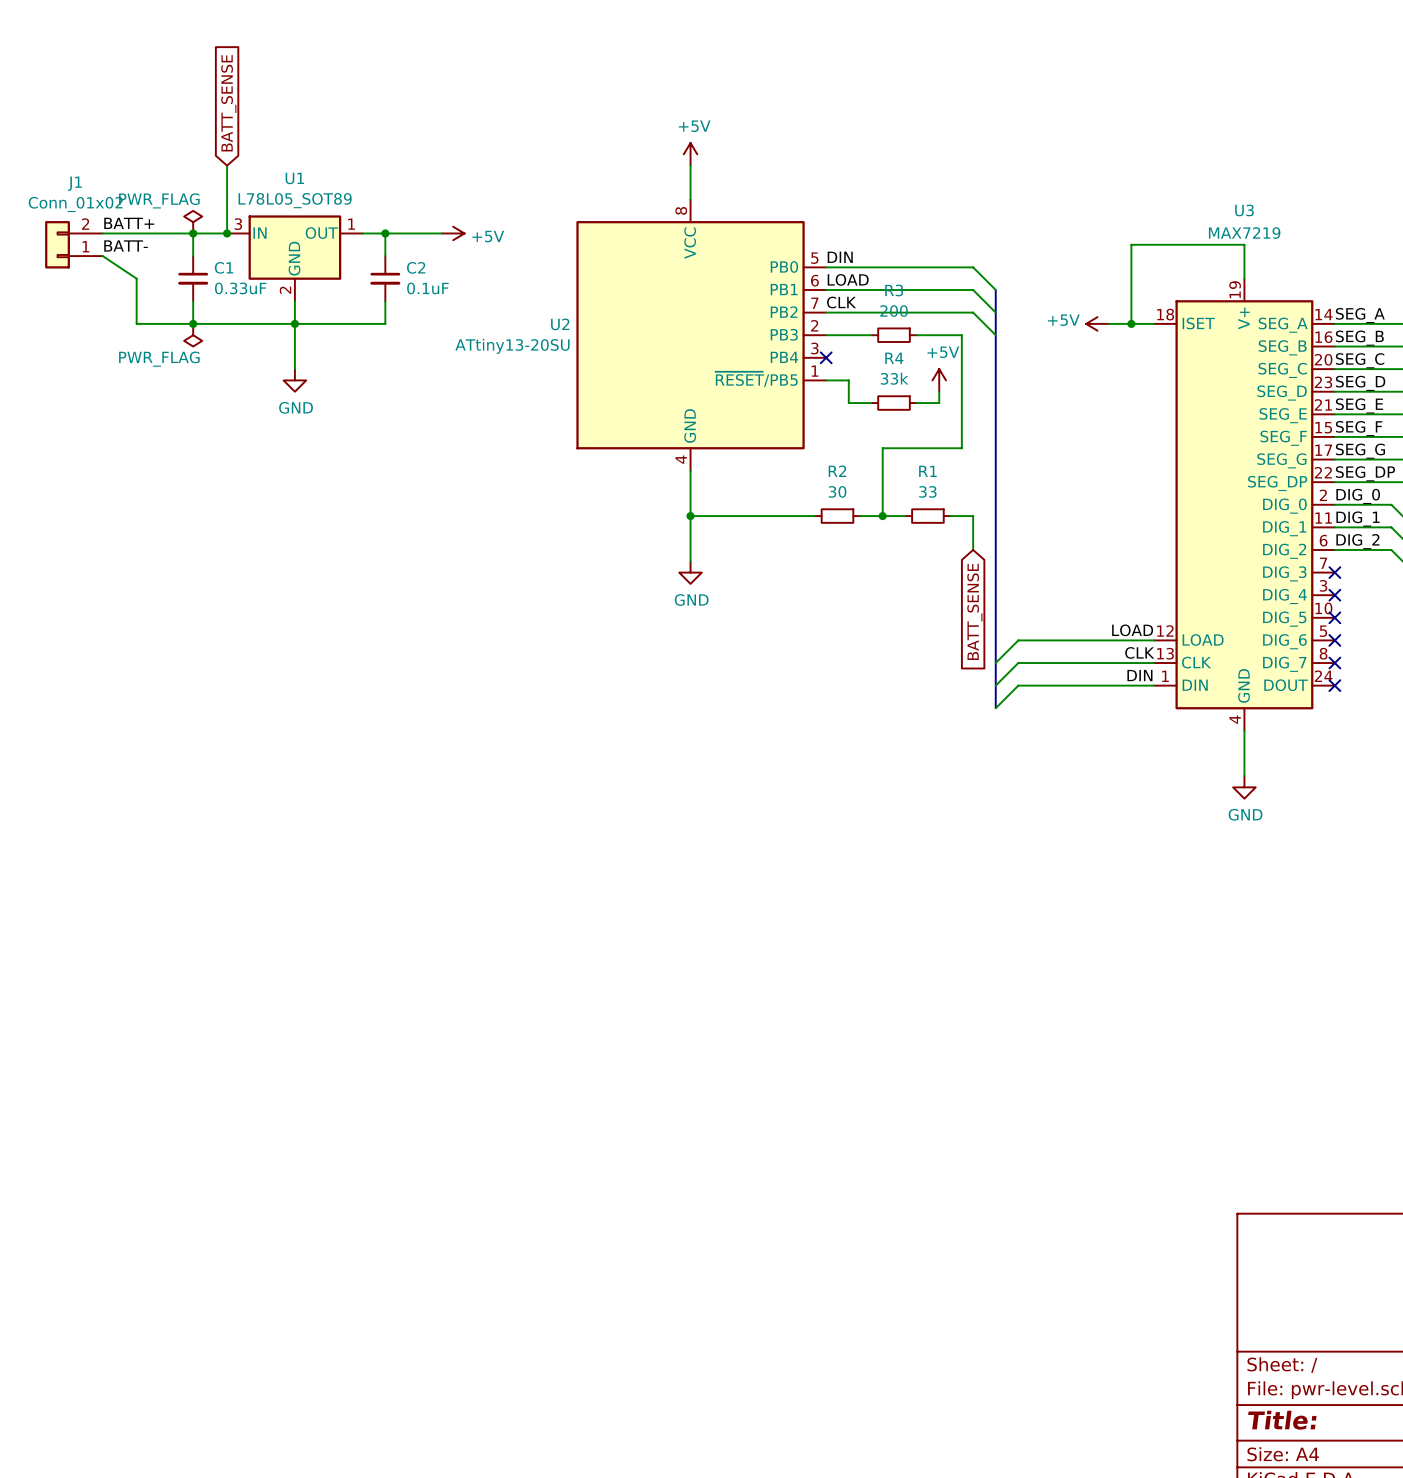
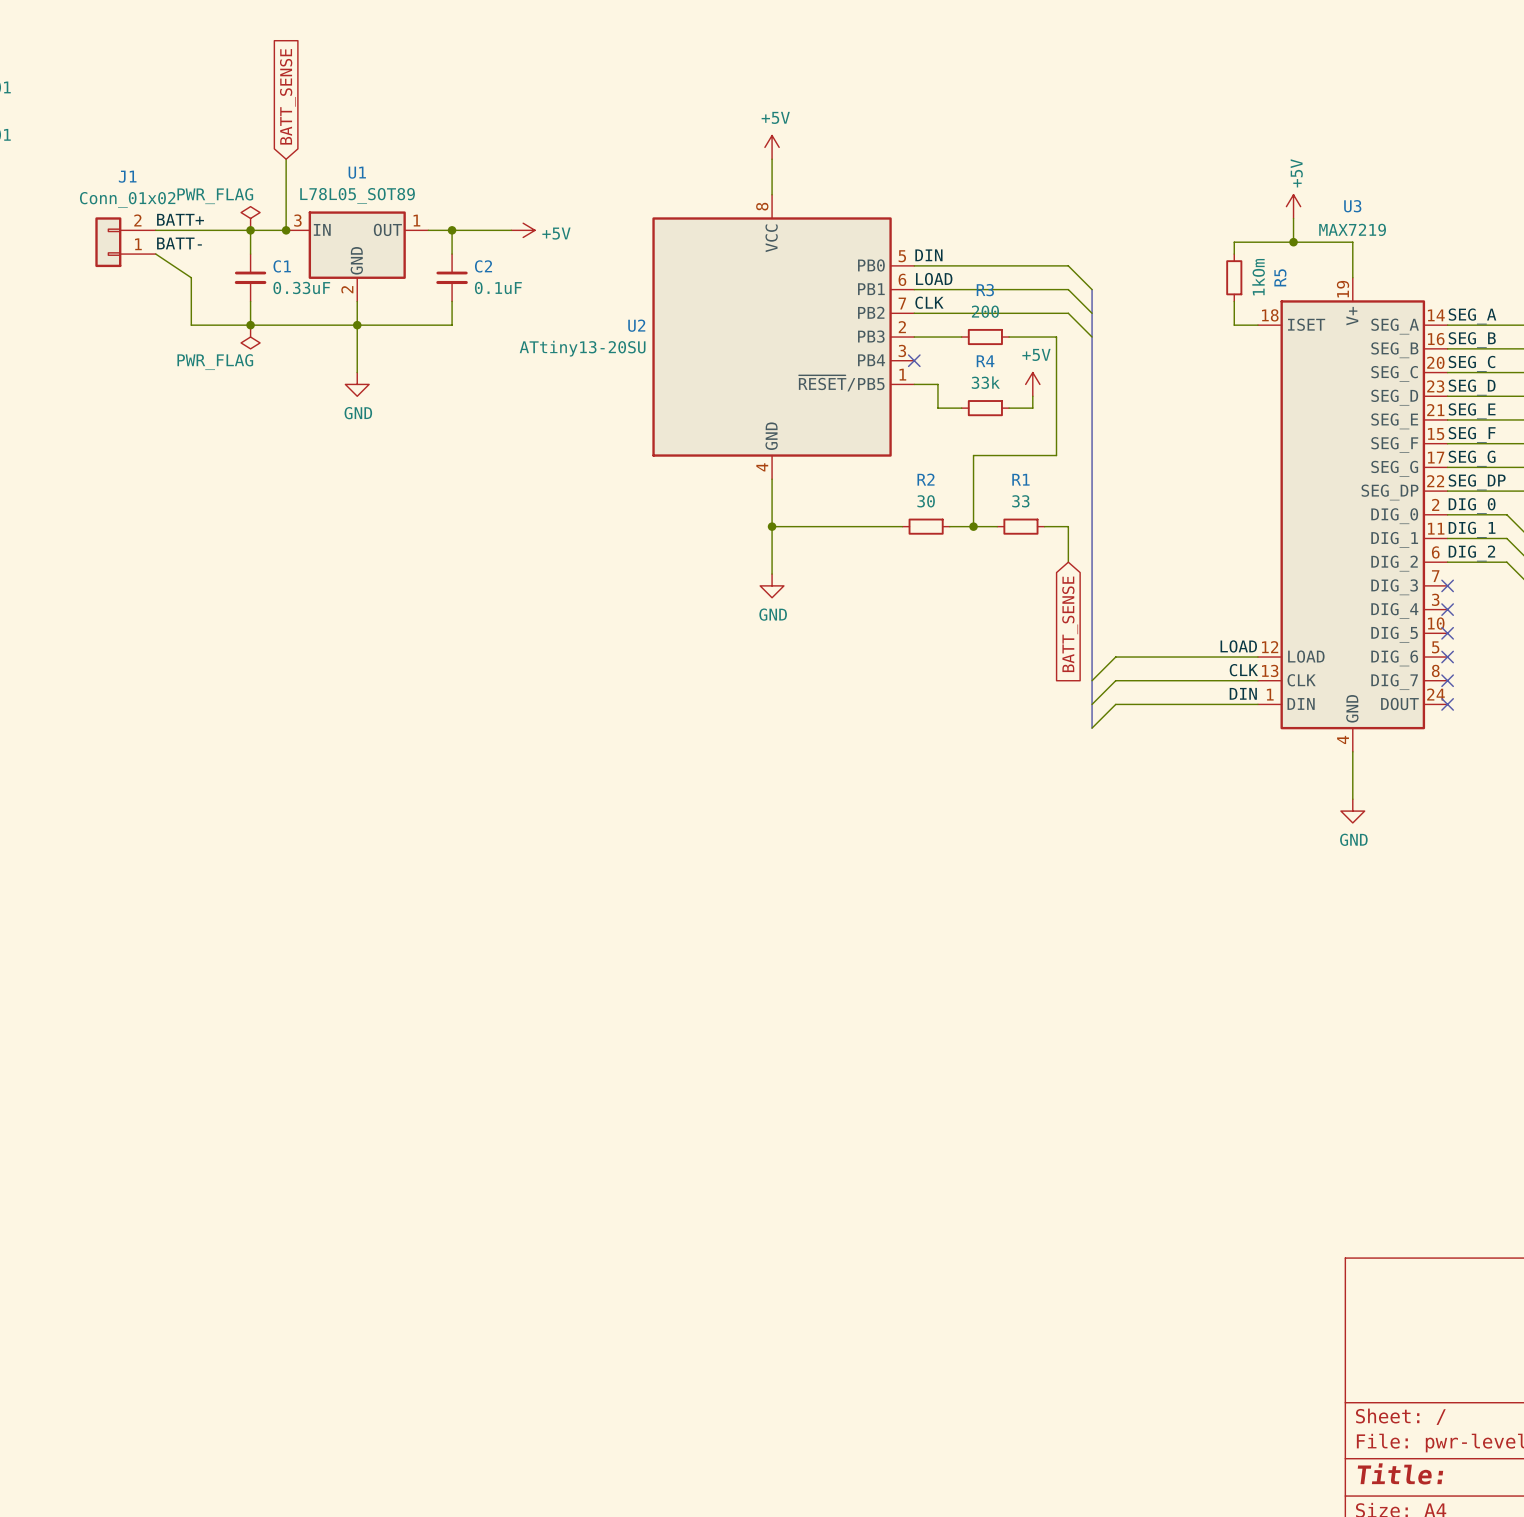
wire: none -> (1293, 218) (1293, 242)
junction: none -> (1293, 242)
wire: (1131, 256) (1131, 301) -> none
R5: none -> 1kOm (1234, 277)
power symbol rotation: 0° (1097, 323) -> 90° clockwise (1293, 206)
power symbol position: +5V (1097, 323) -> +5V (1293, 206)
wire: (1108, 323) (1131, 323) -> none
junction: (1131, 323) -> none

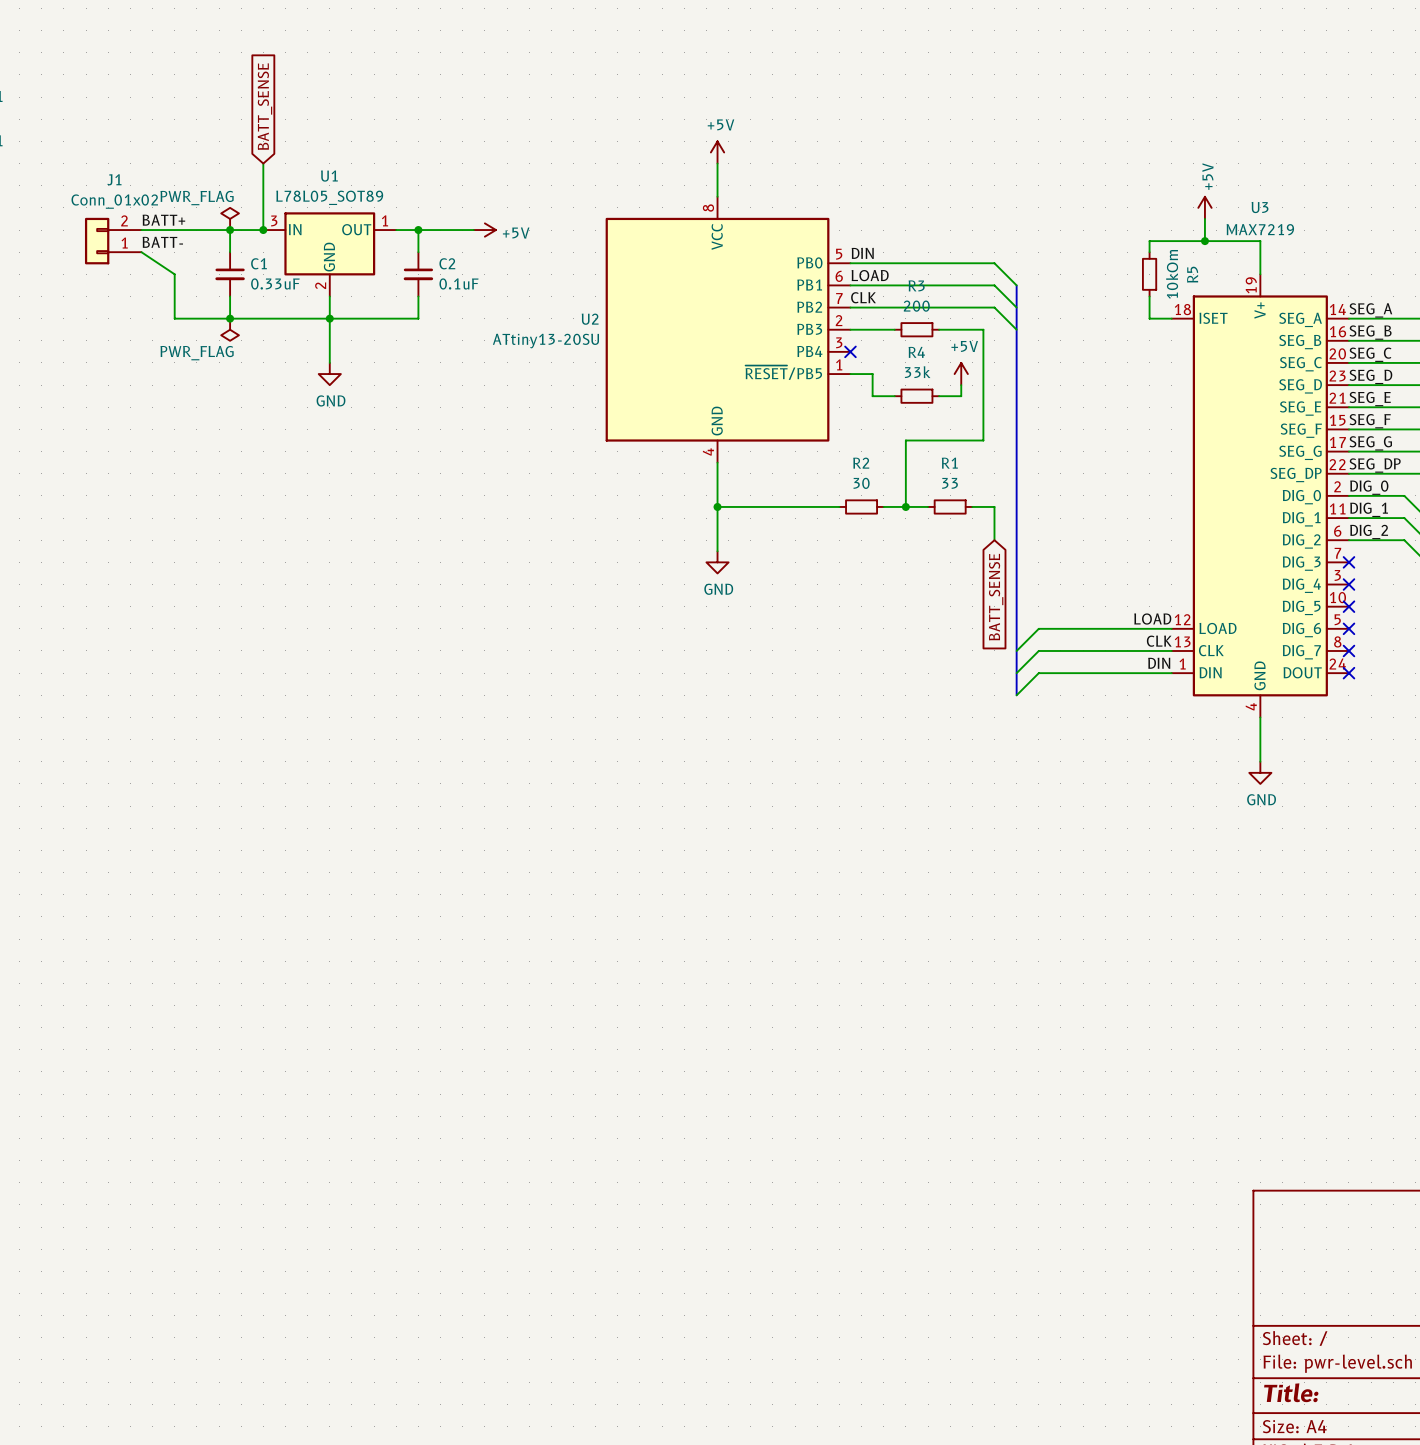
R5 value: 1kOm (1258, 277) -> 10kOm (1172, 274)

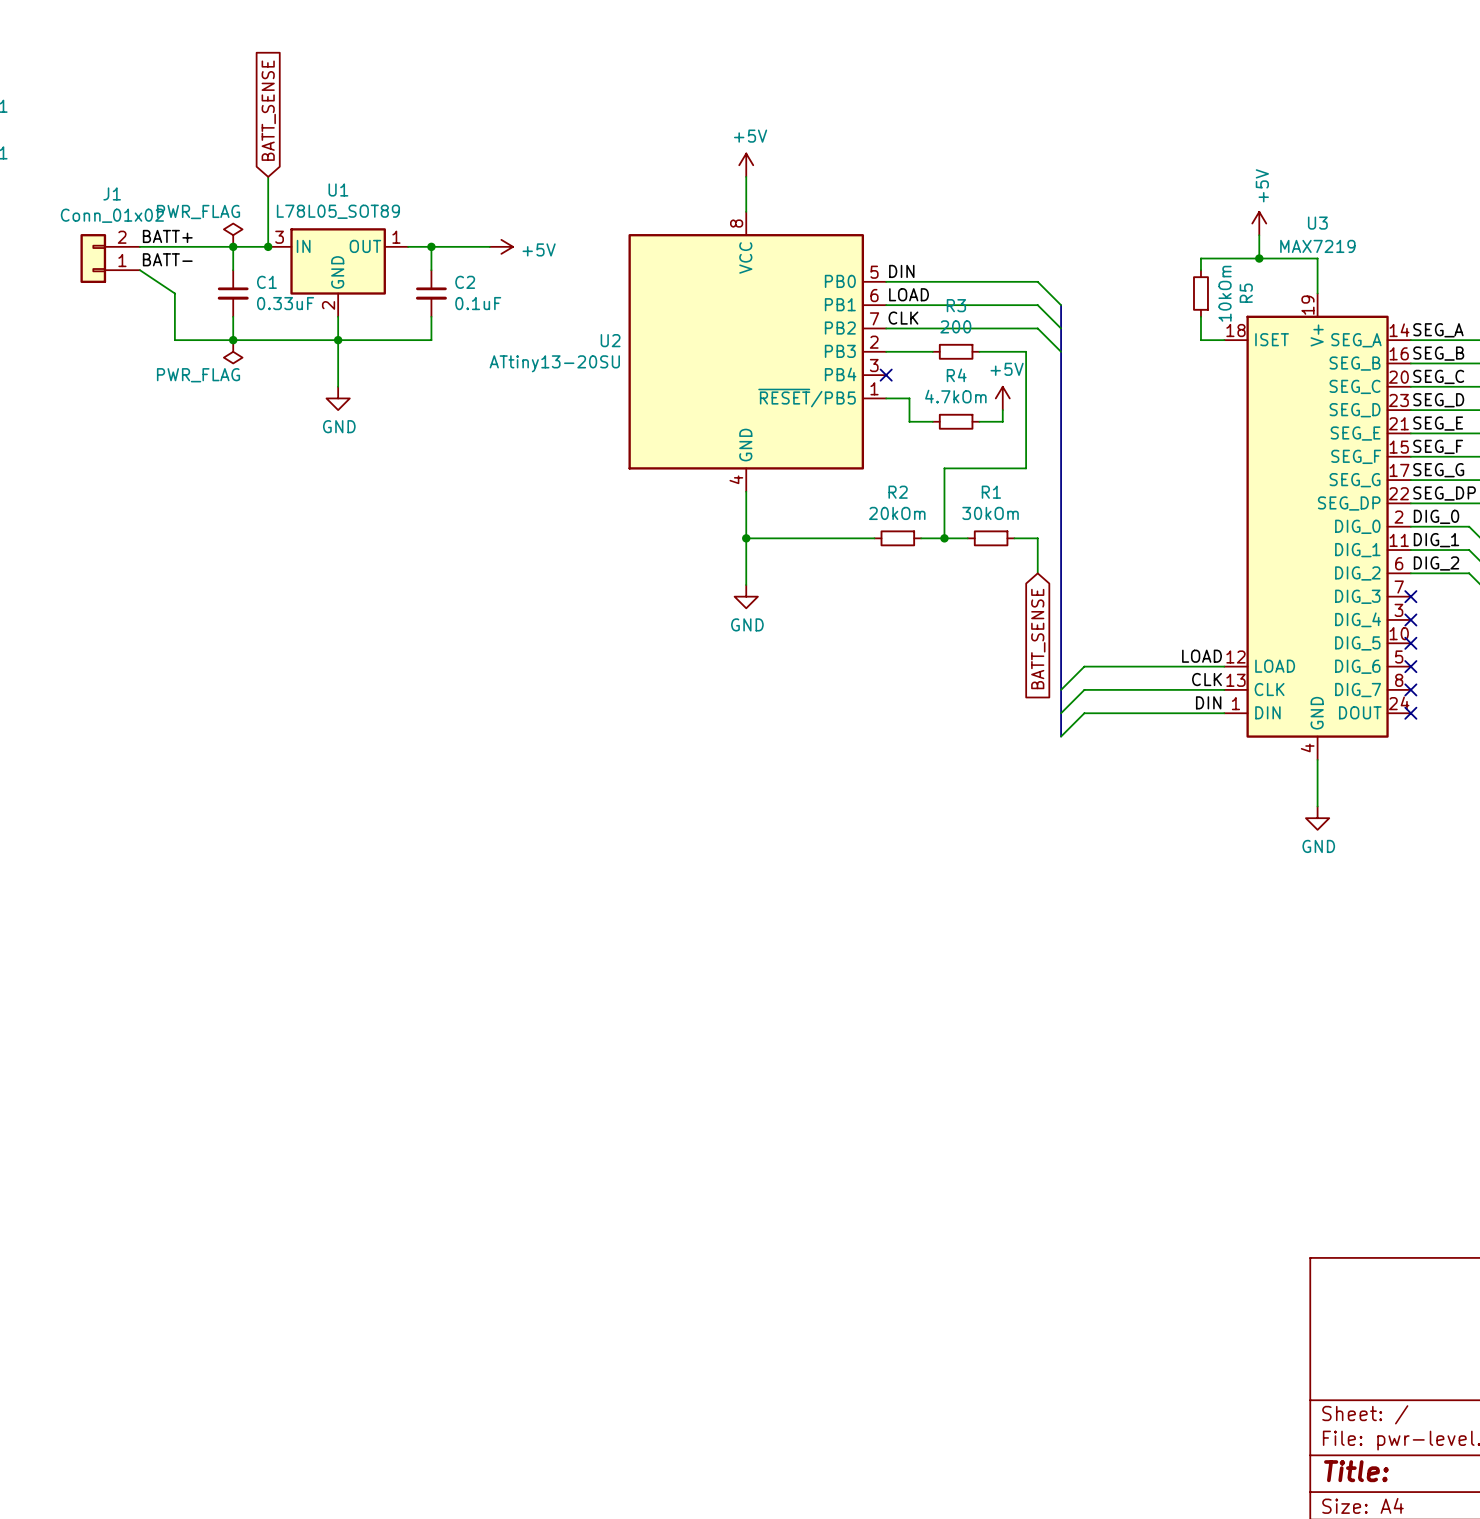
R4 value: 33k (917, 372) -> 4.7kOm (955, 396)
R2 value: 30 (861, 483) -> 20kOm (897, 513)
R1 value: 33 (950, 483) -> 30kOm (990, 513)

